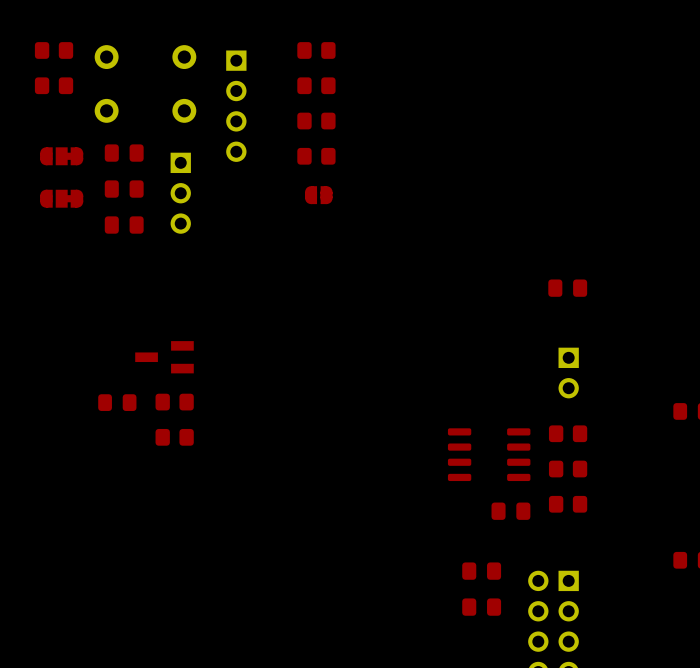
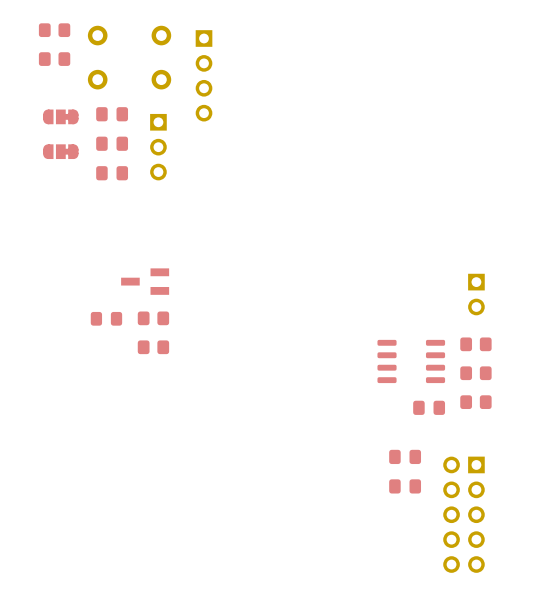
part: (316, 50) -> none
part: (316, 85) -> none
part: (316, 121) -> none
part: (316, 156) -> none
part: (318, 195) -> none
part: (567, 288) -> none

